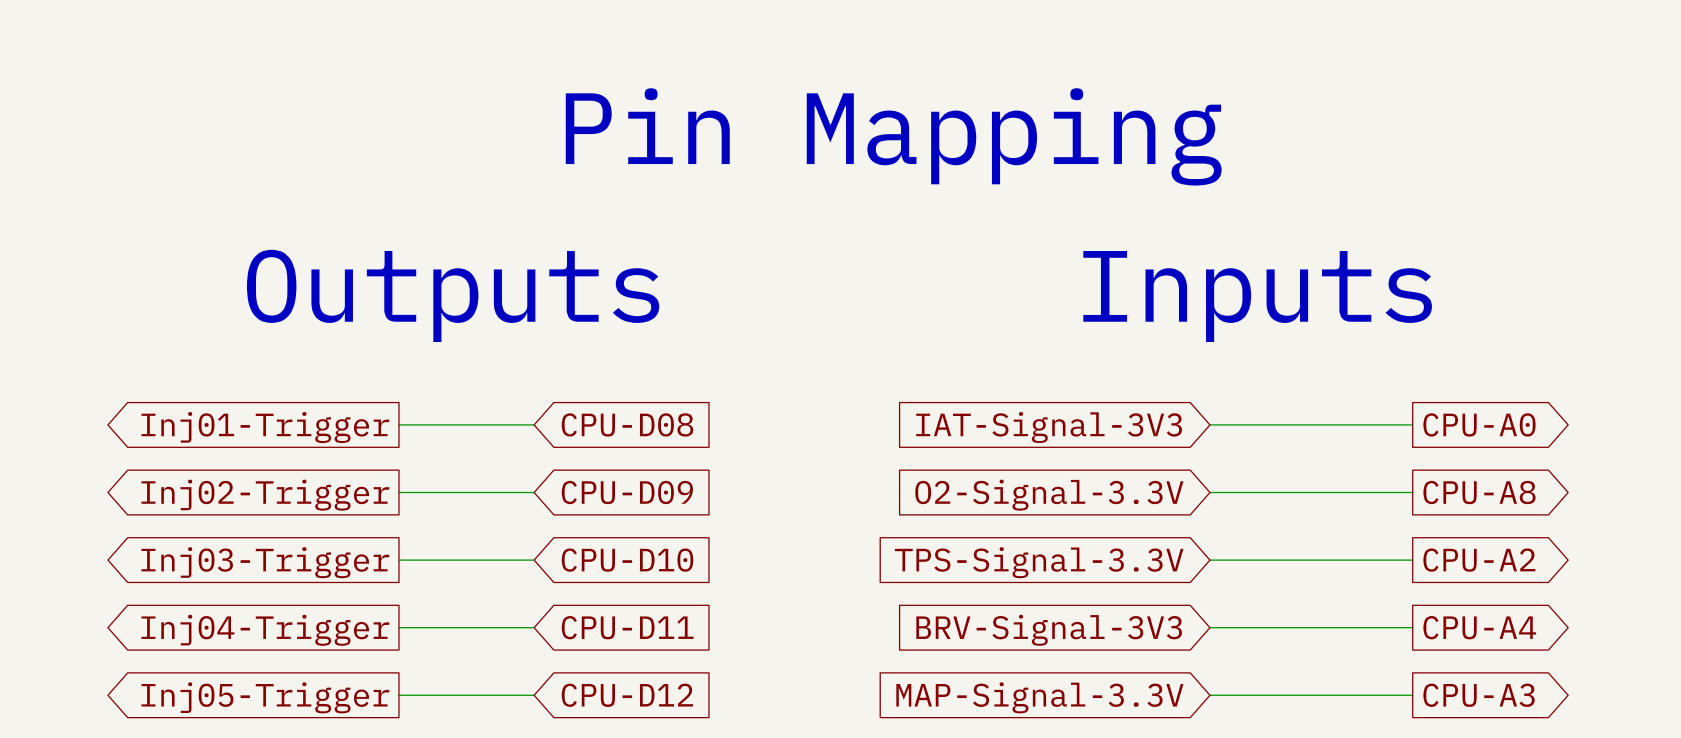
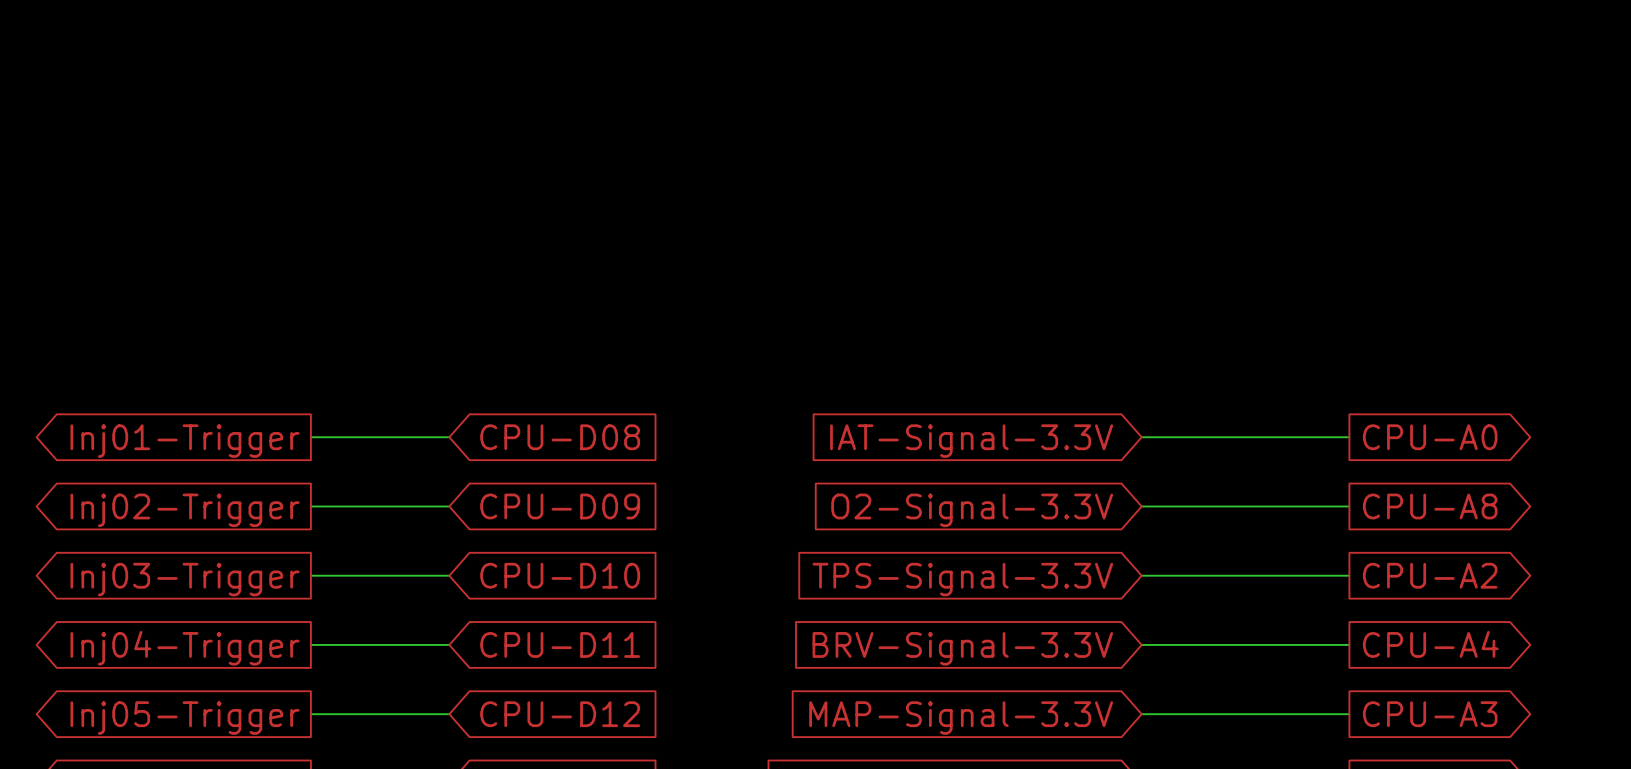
text: Pin Mapping (893, 136) -> none
text: Outputs (453, 295) -> none
text: Inputs (1257, 296) -> none
global label: IAT-Signal-3V3 (1049, 427) -> IAT-Signal-3.3V (971, 441)
global label: BRV-Signal-3V3 (1049, 630) -> BRV-Signal-3.3V (962, 648)

